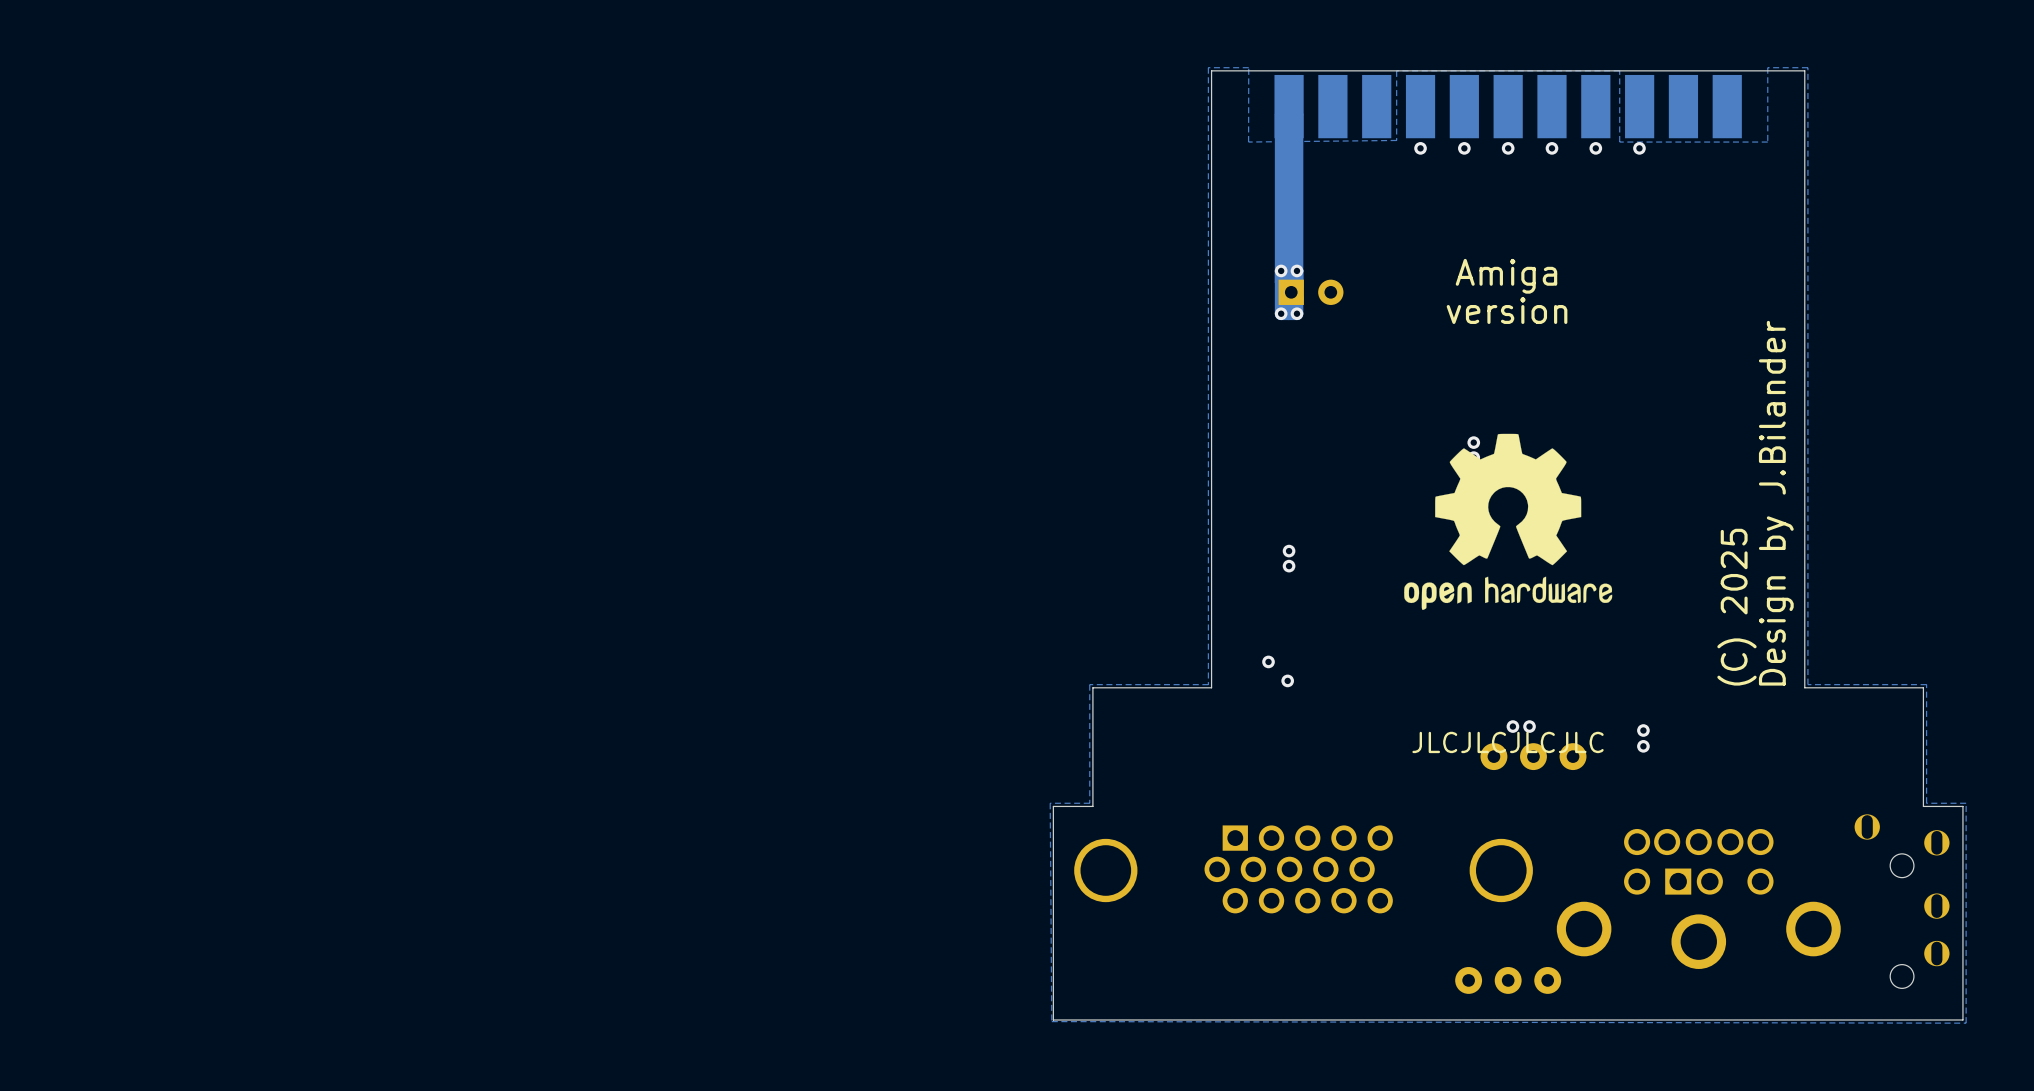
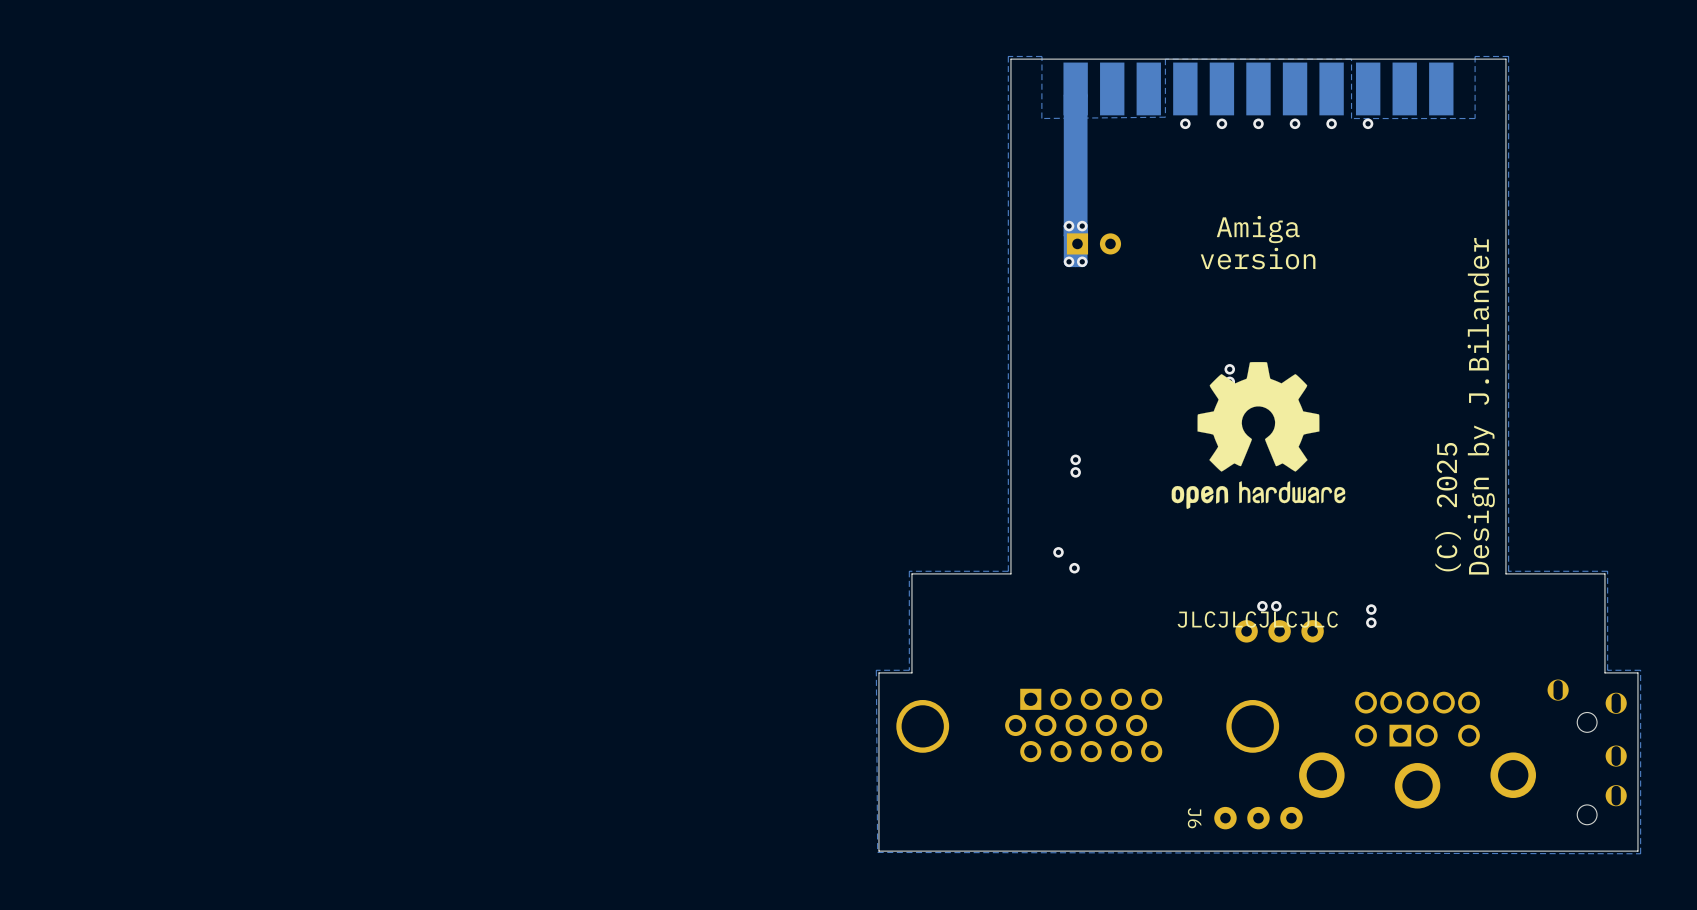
J6 name: none -> J6 (1194, 818)

